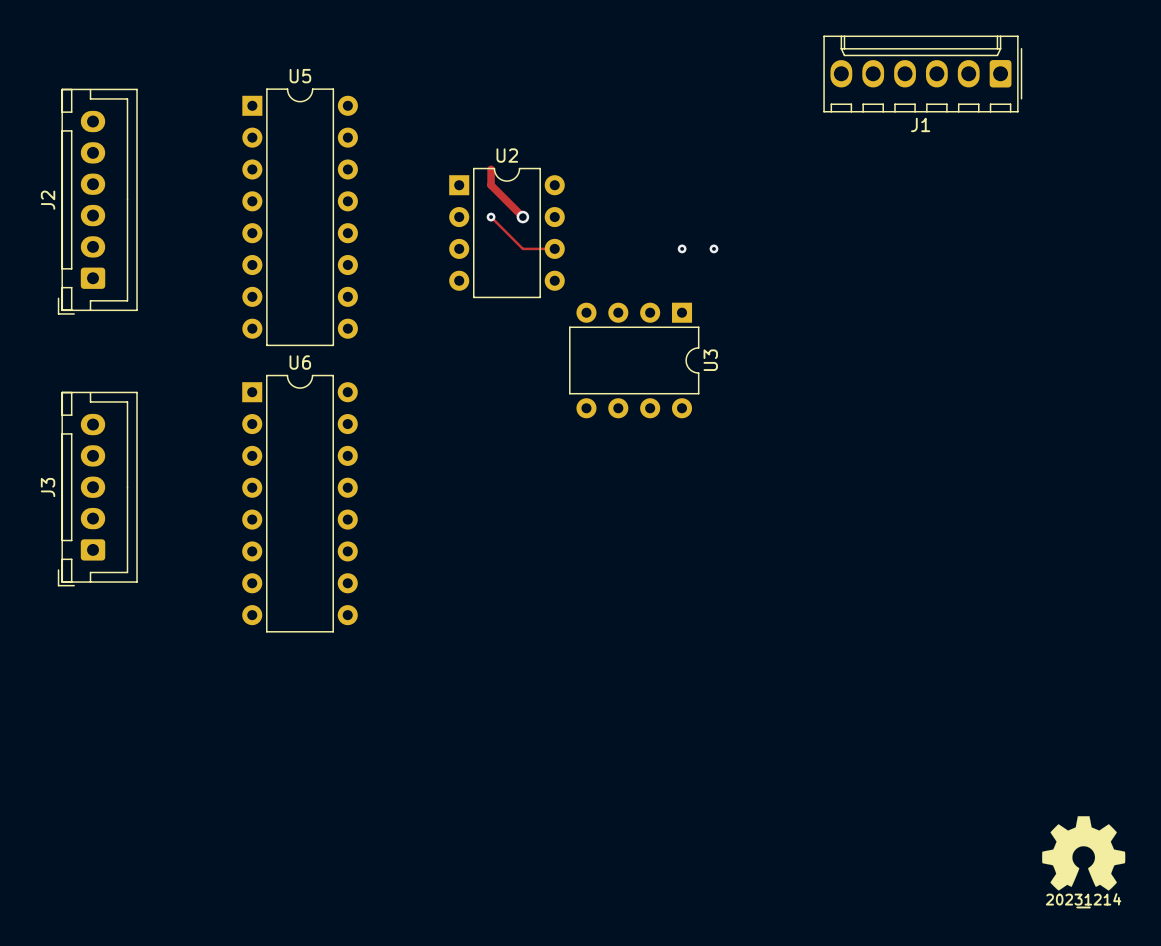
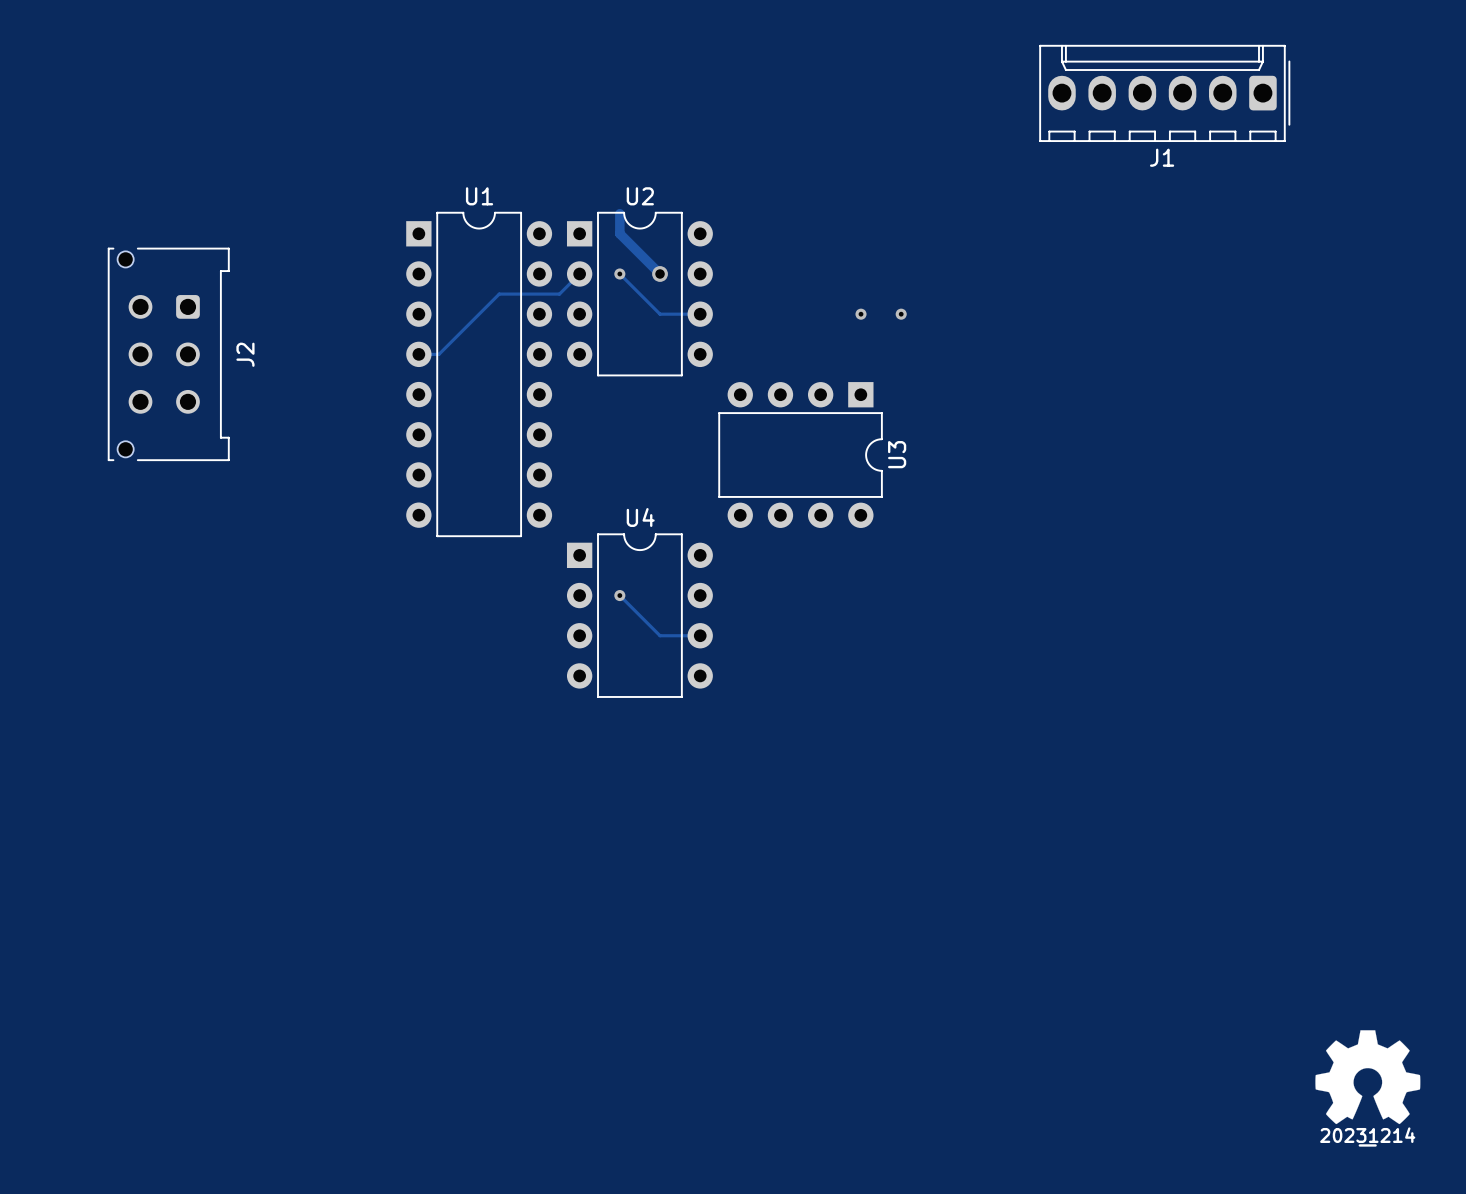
J2 footprint: [57, 88, 138, 315] -> [107, 247, 230, 462]
J2 name position: J2 (48, 200) -> J2 (245, 354)
U5: (300, 217) -> none
track: none -> (579, 273) (559, 294) (499, 294) (438, 354) (418, 354)
U1: none -> (479, 374)
track: none -> (619, 595) (660, 635) (700, 635)
via: none -> (619, 595)
U4: none -> (639, 615)
J3: (97, 489) -> none
U6: (299, 503) -> none

